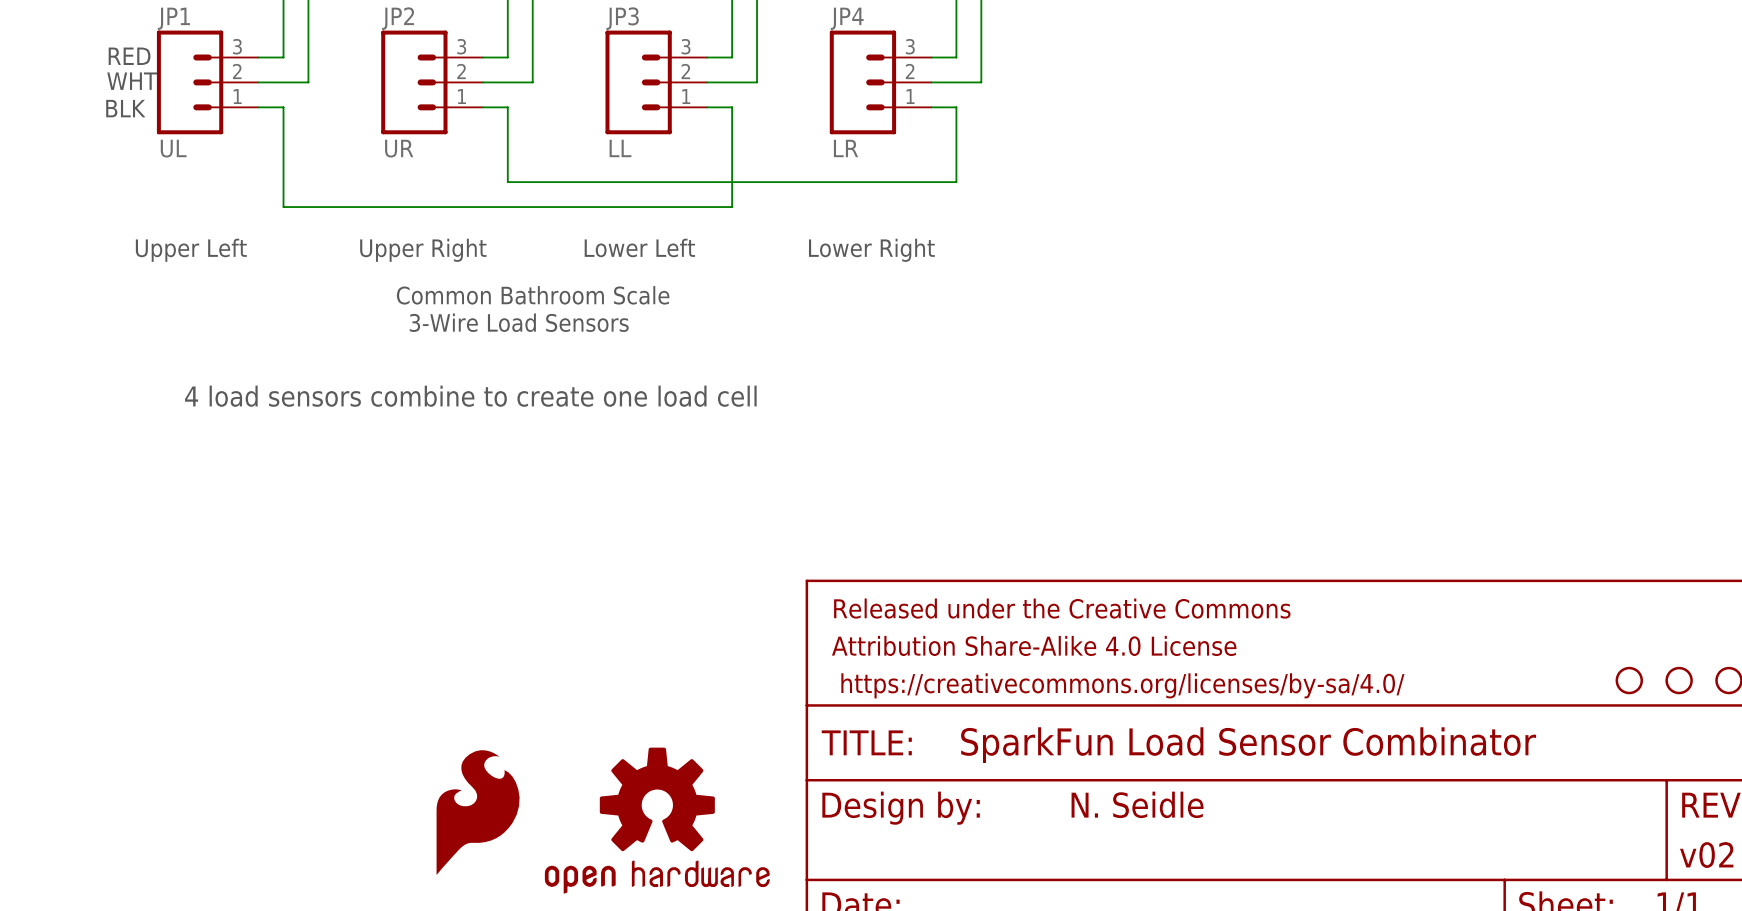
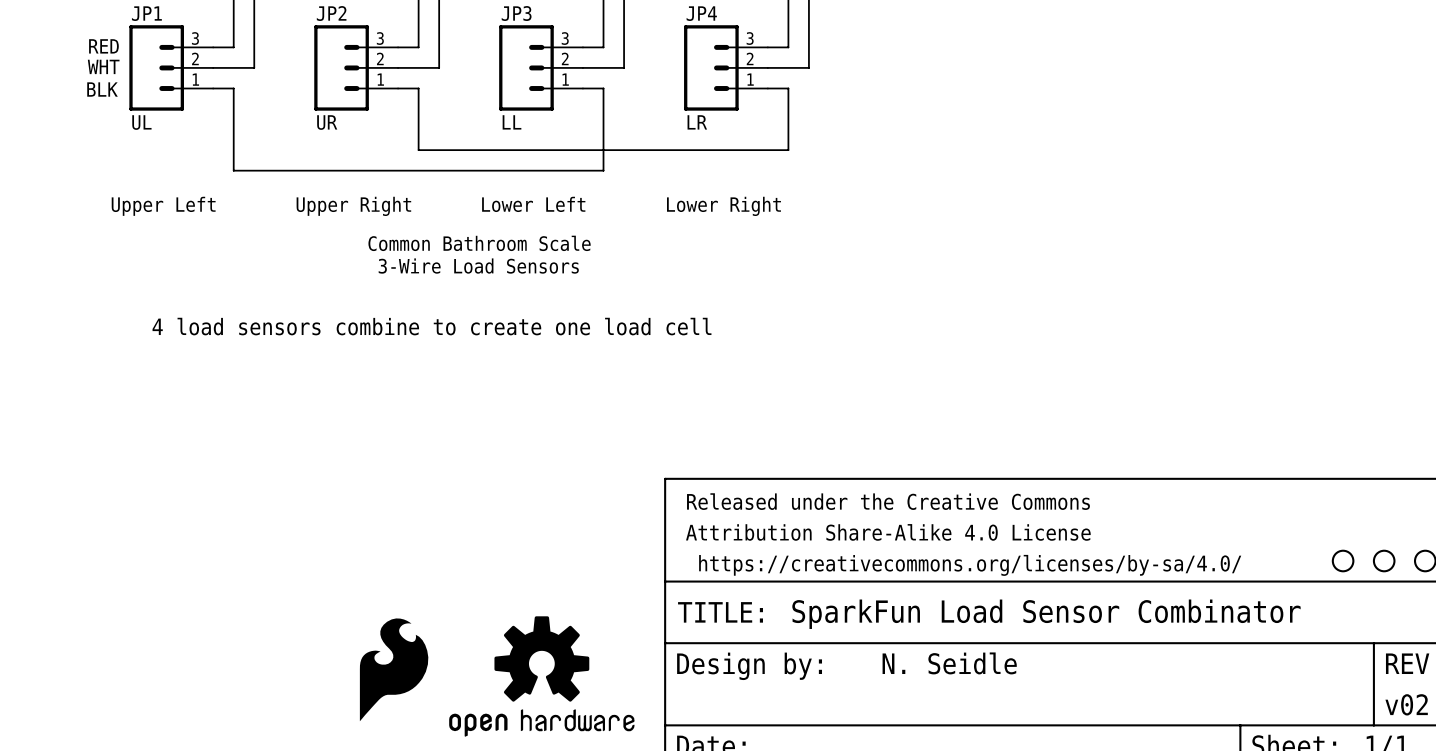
text position: Common Bathroom Scale (533, 295) -> Common Bathroom Scale (479, 243)
text position: 3-Wire Load Sensors (519, 322) -> 3-Wire Load Sensors (478, 266)

